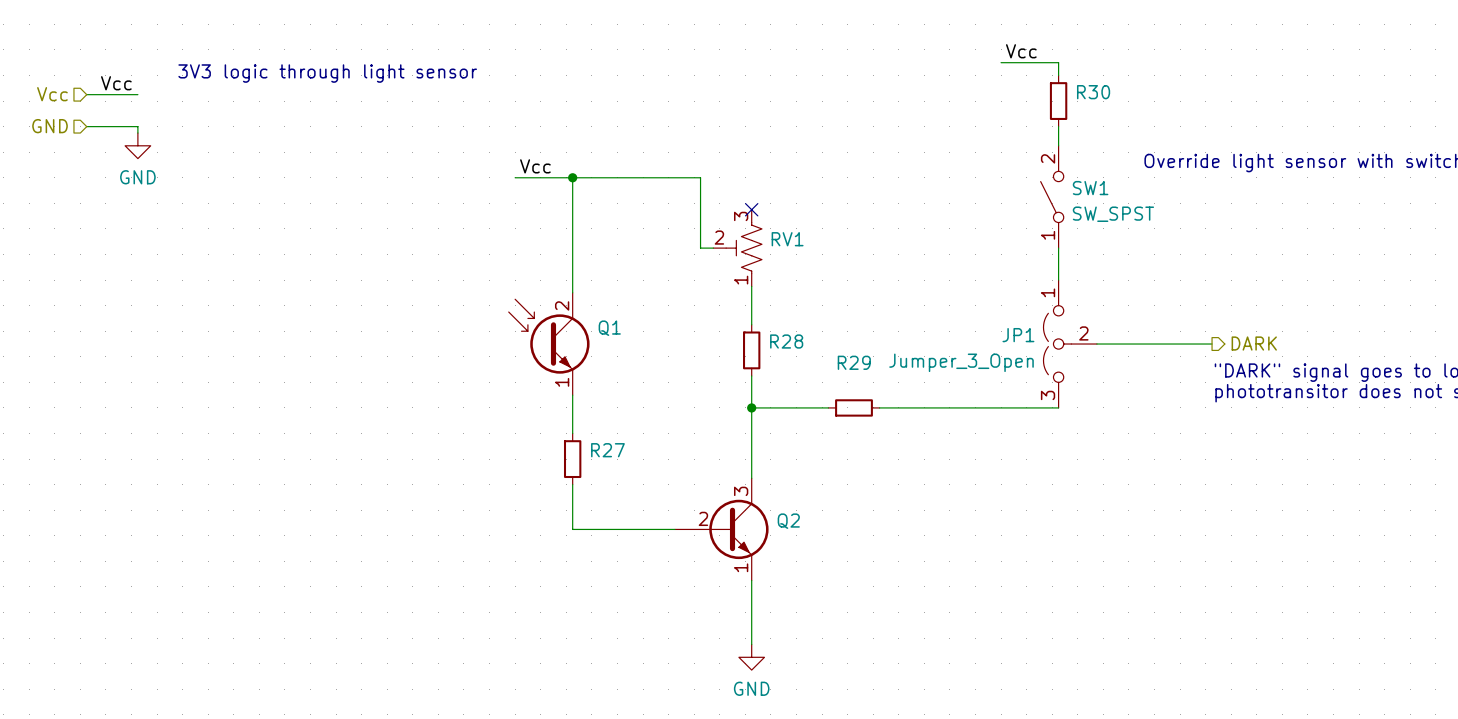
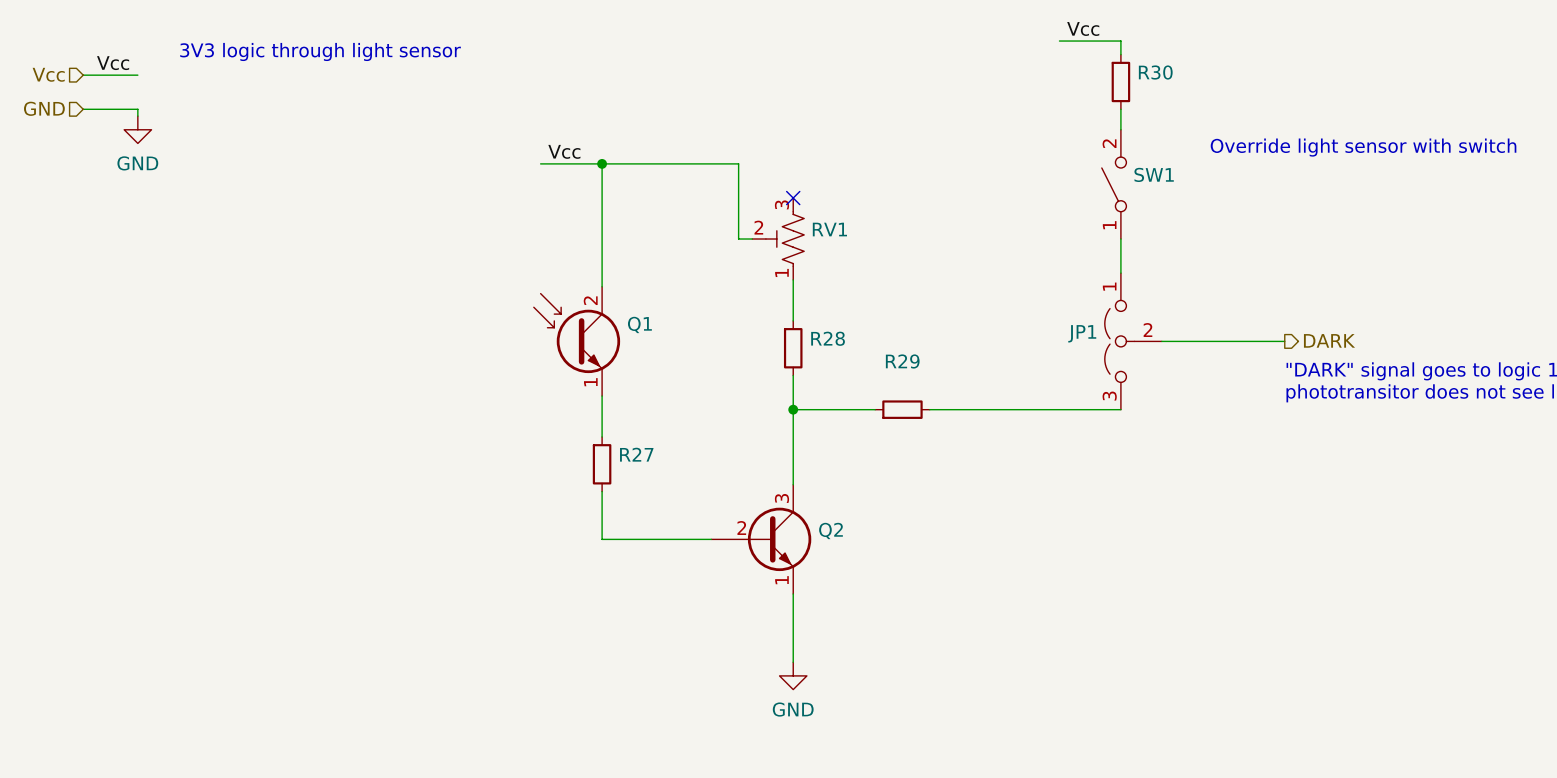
SW1 value: SW_SPST (1113, 214) -> none
JP1 value: Jumper_3_Open (961, 362) -> none

